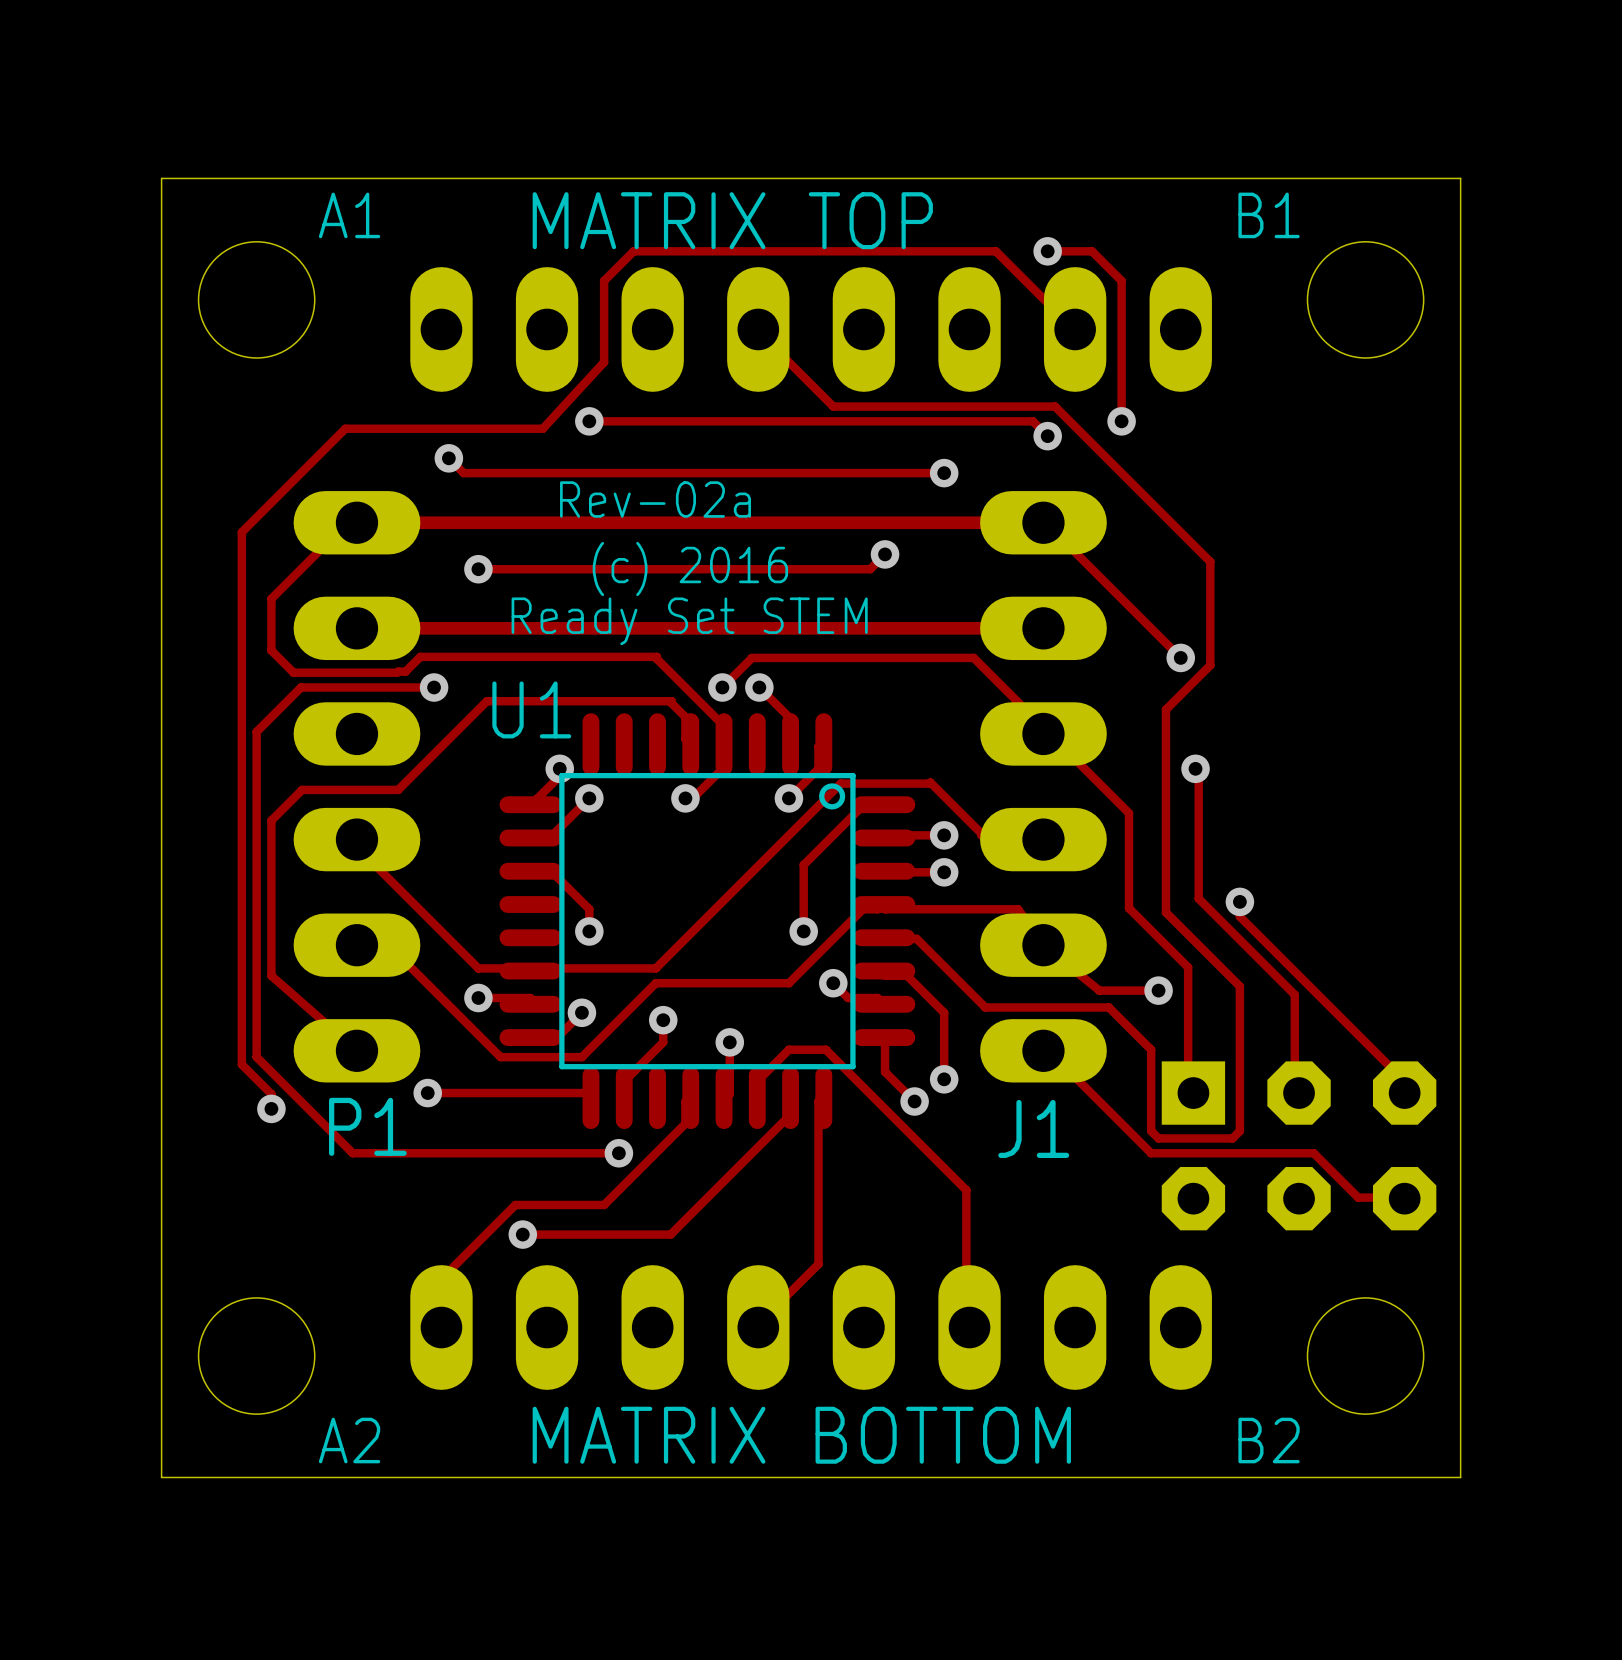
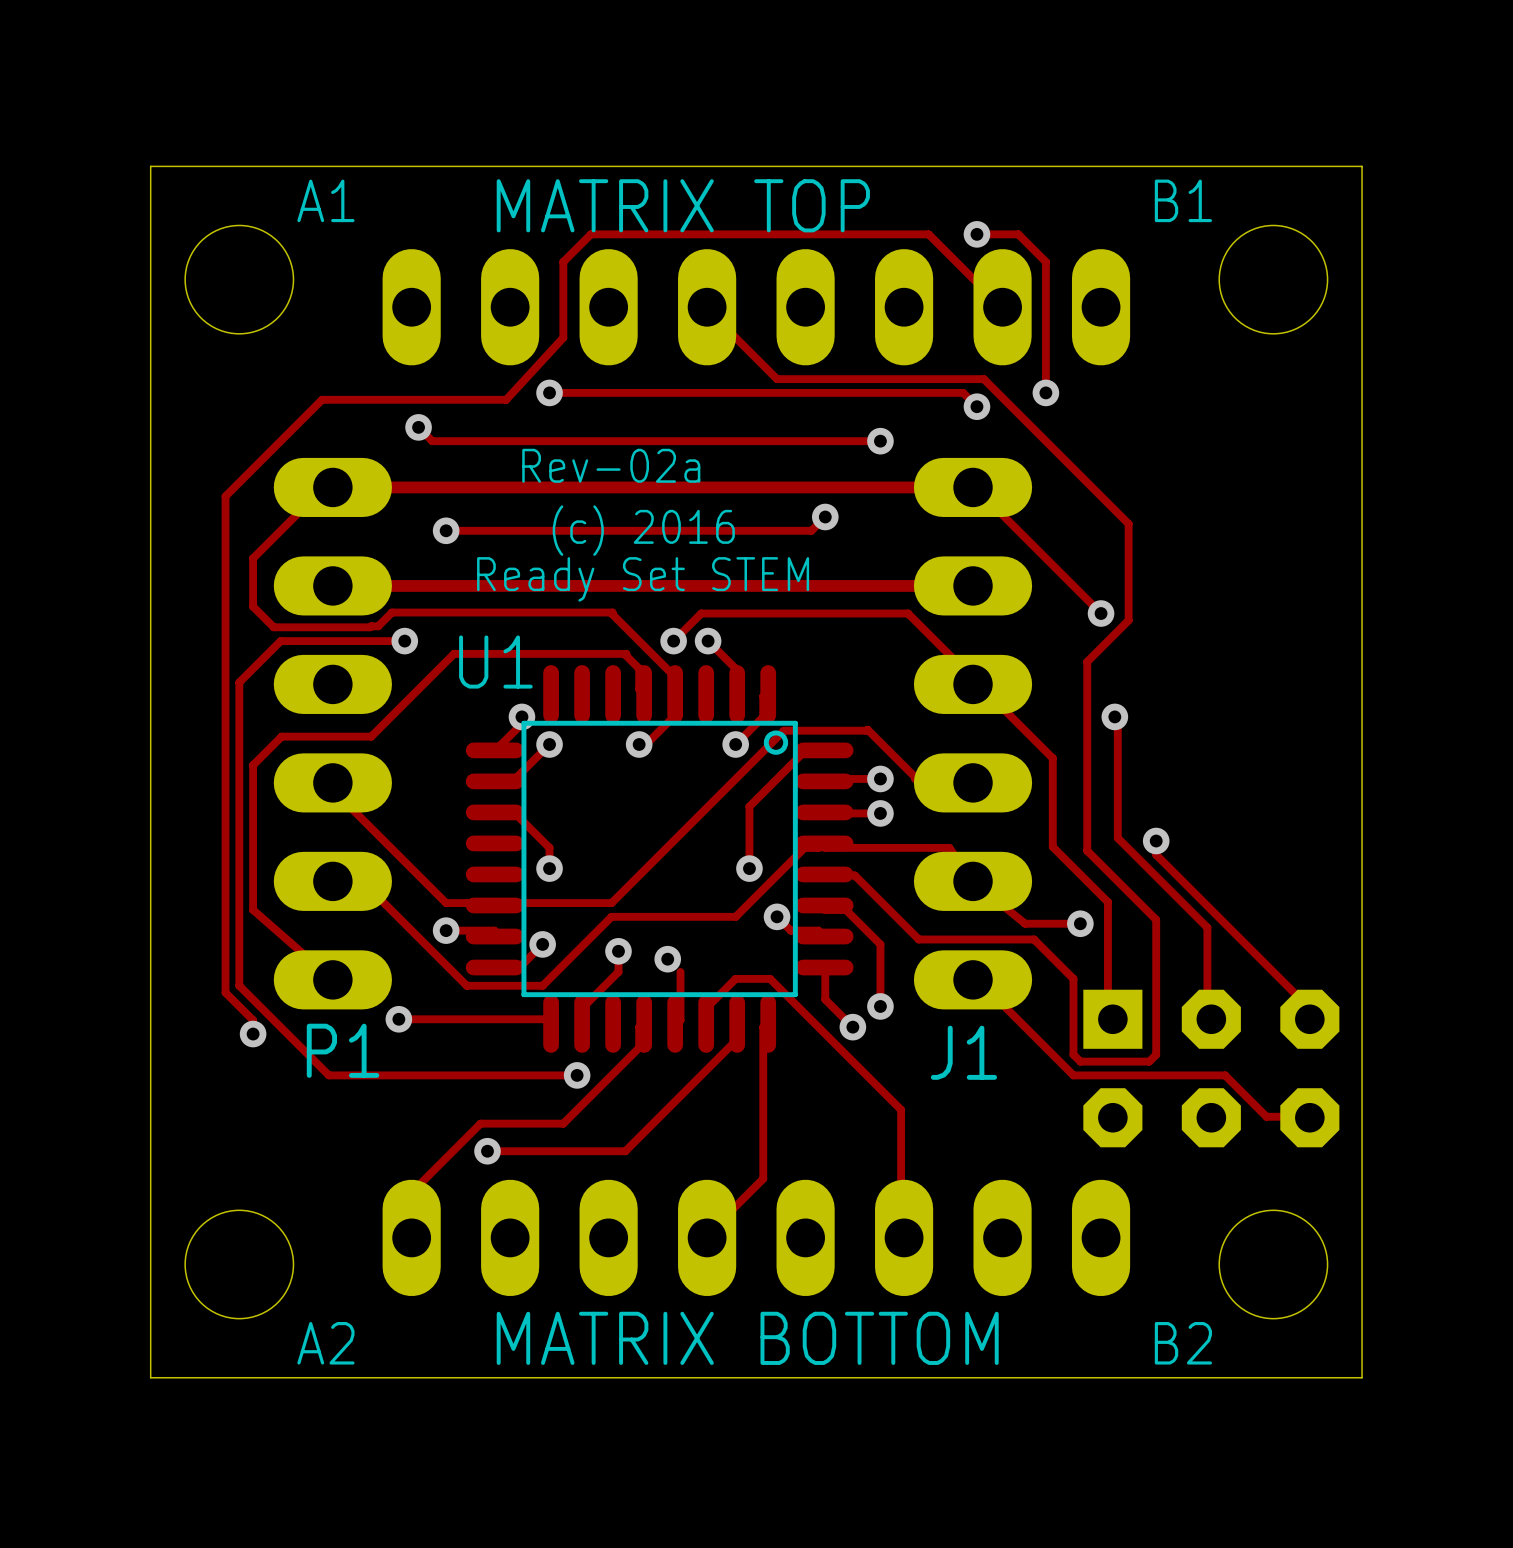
via position: (729, 1042) -> (667, 959)

